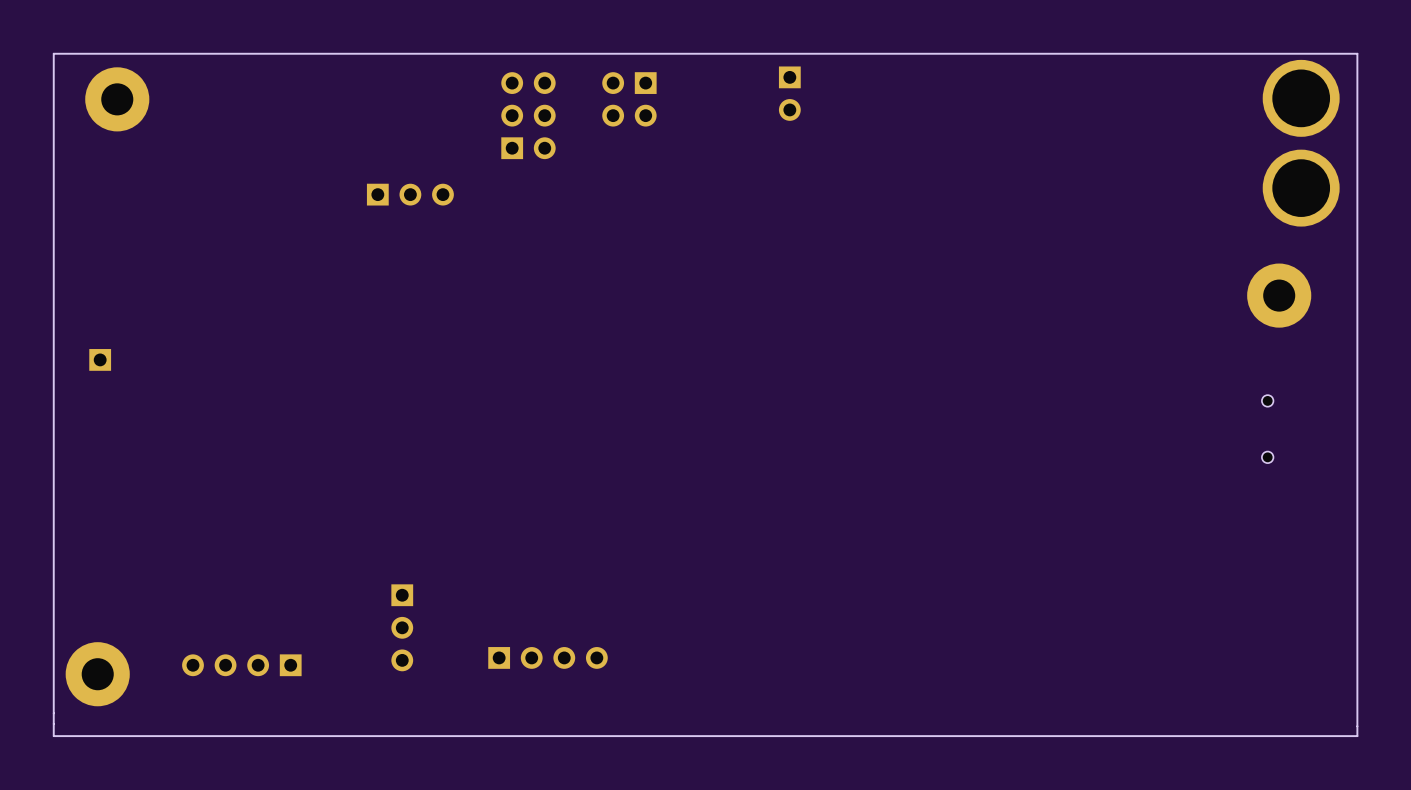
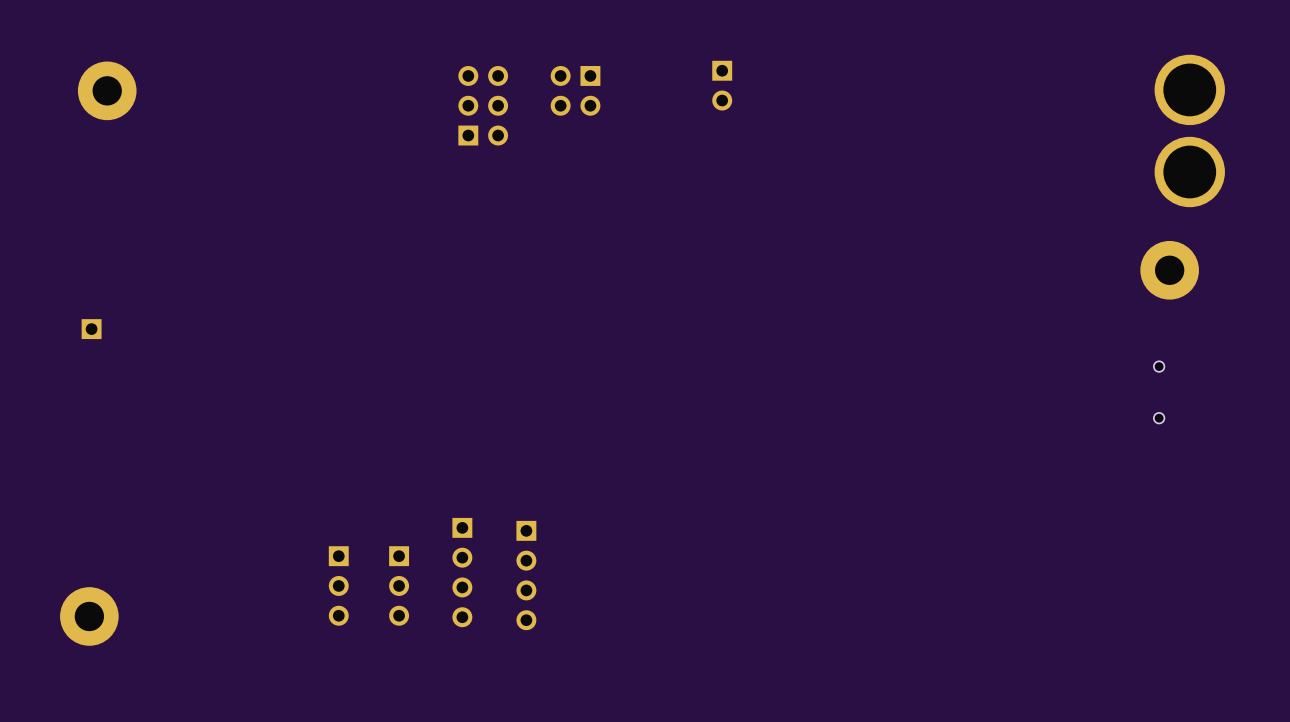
board edge: (1357, 53) (1357, 736) (53, 736) (53, 53) (1357, 53) -> none
part: (410, 194) -> none
part: none -> (462, 572)
part: (402, 627) -> none
part: none -> (526, 575)
part: none -> (338, 585)
part: none -> (399, 585)
part: (548, 657) -> none
part: (241, 665) -> none

